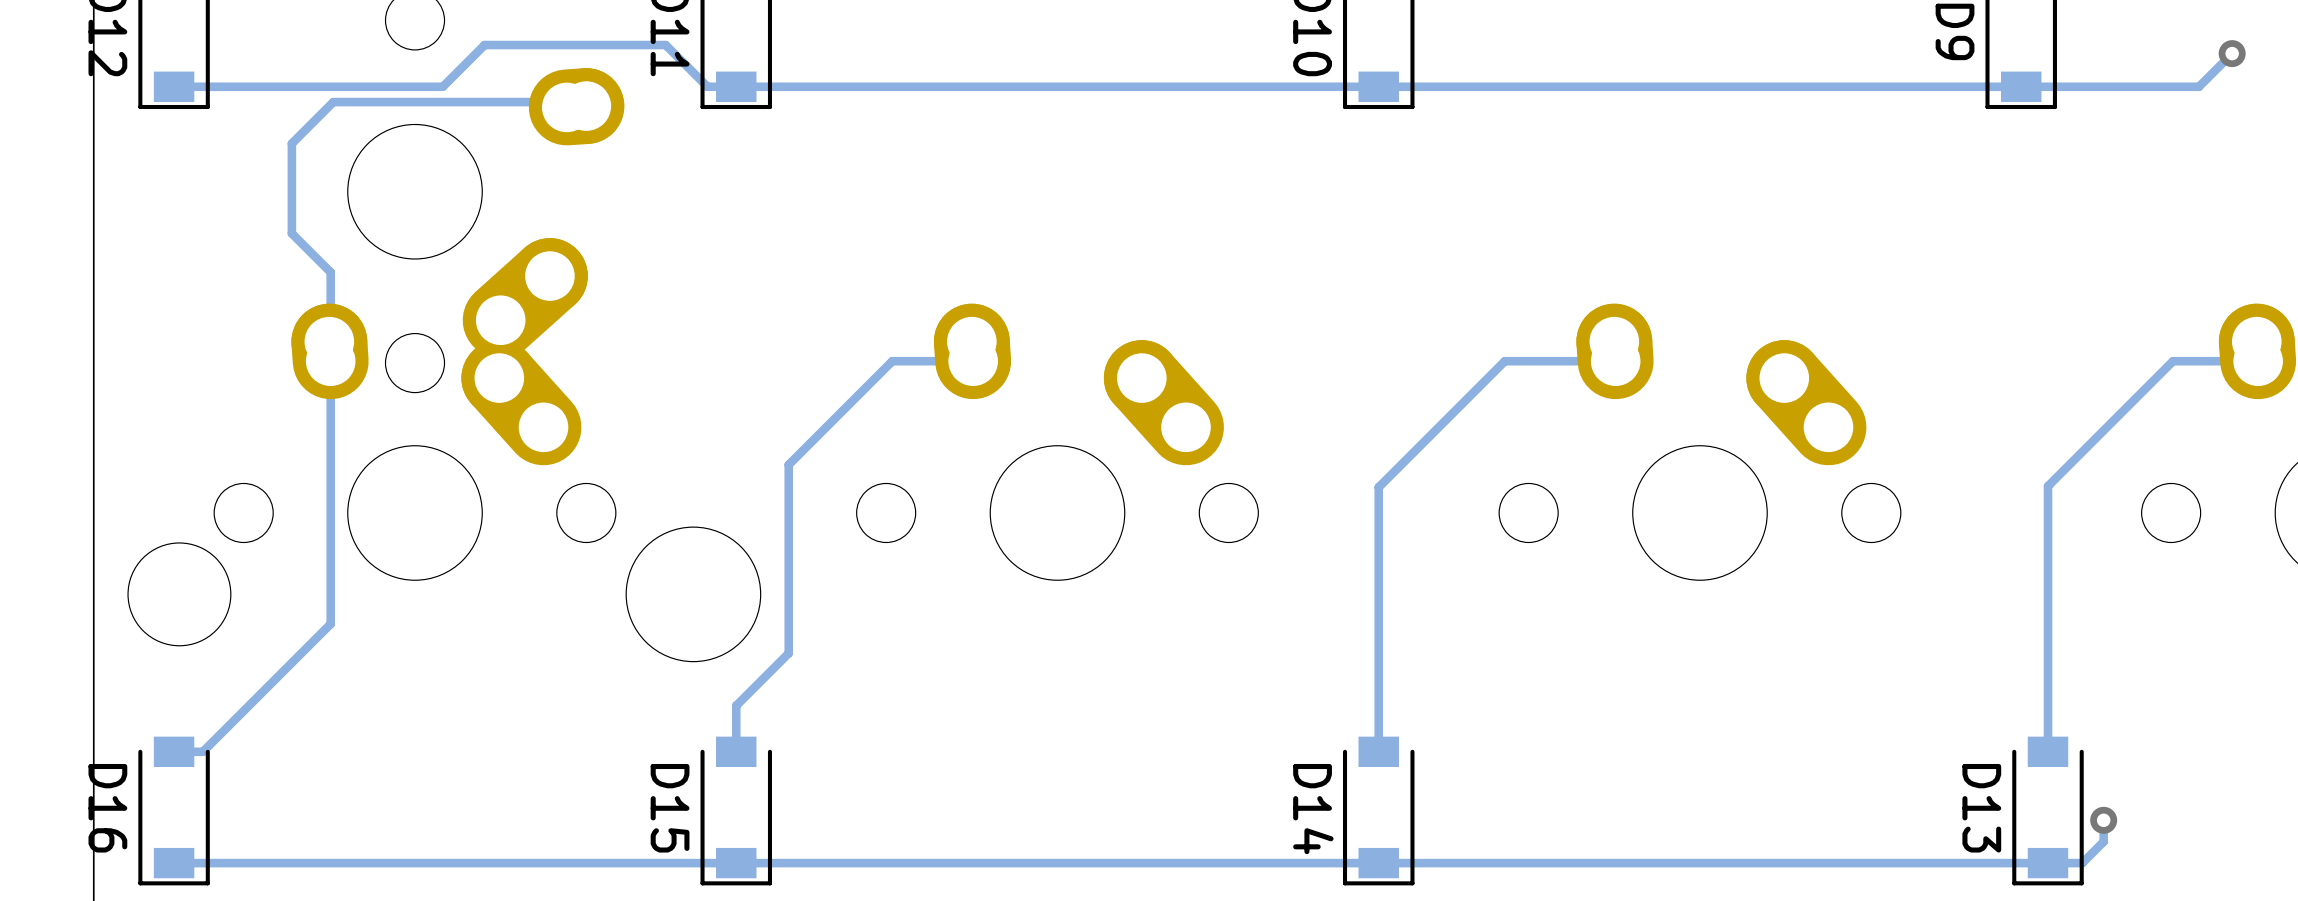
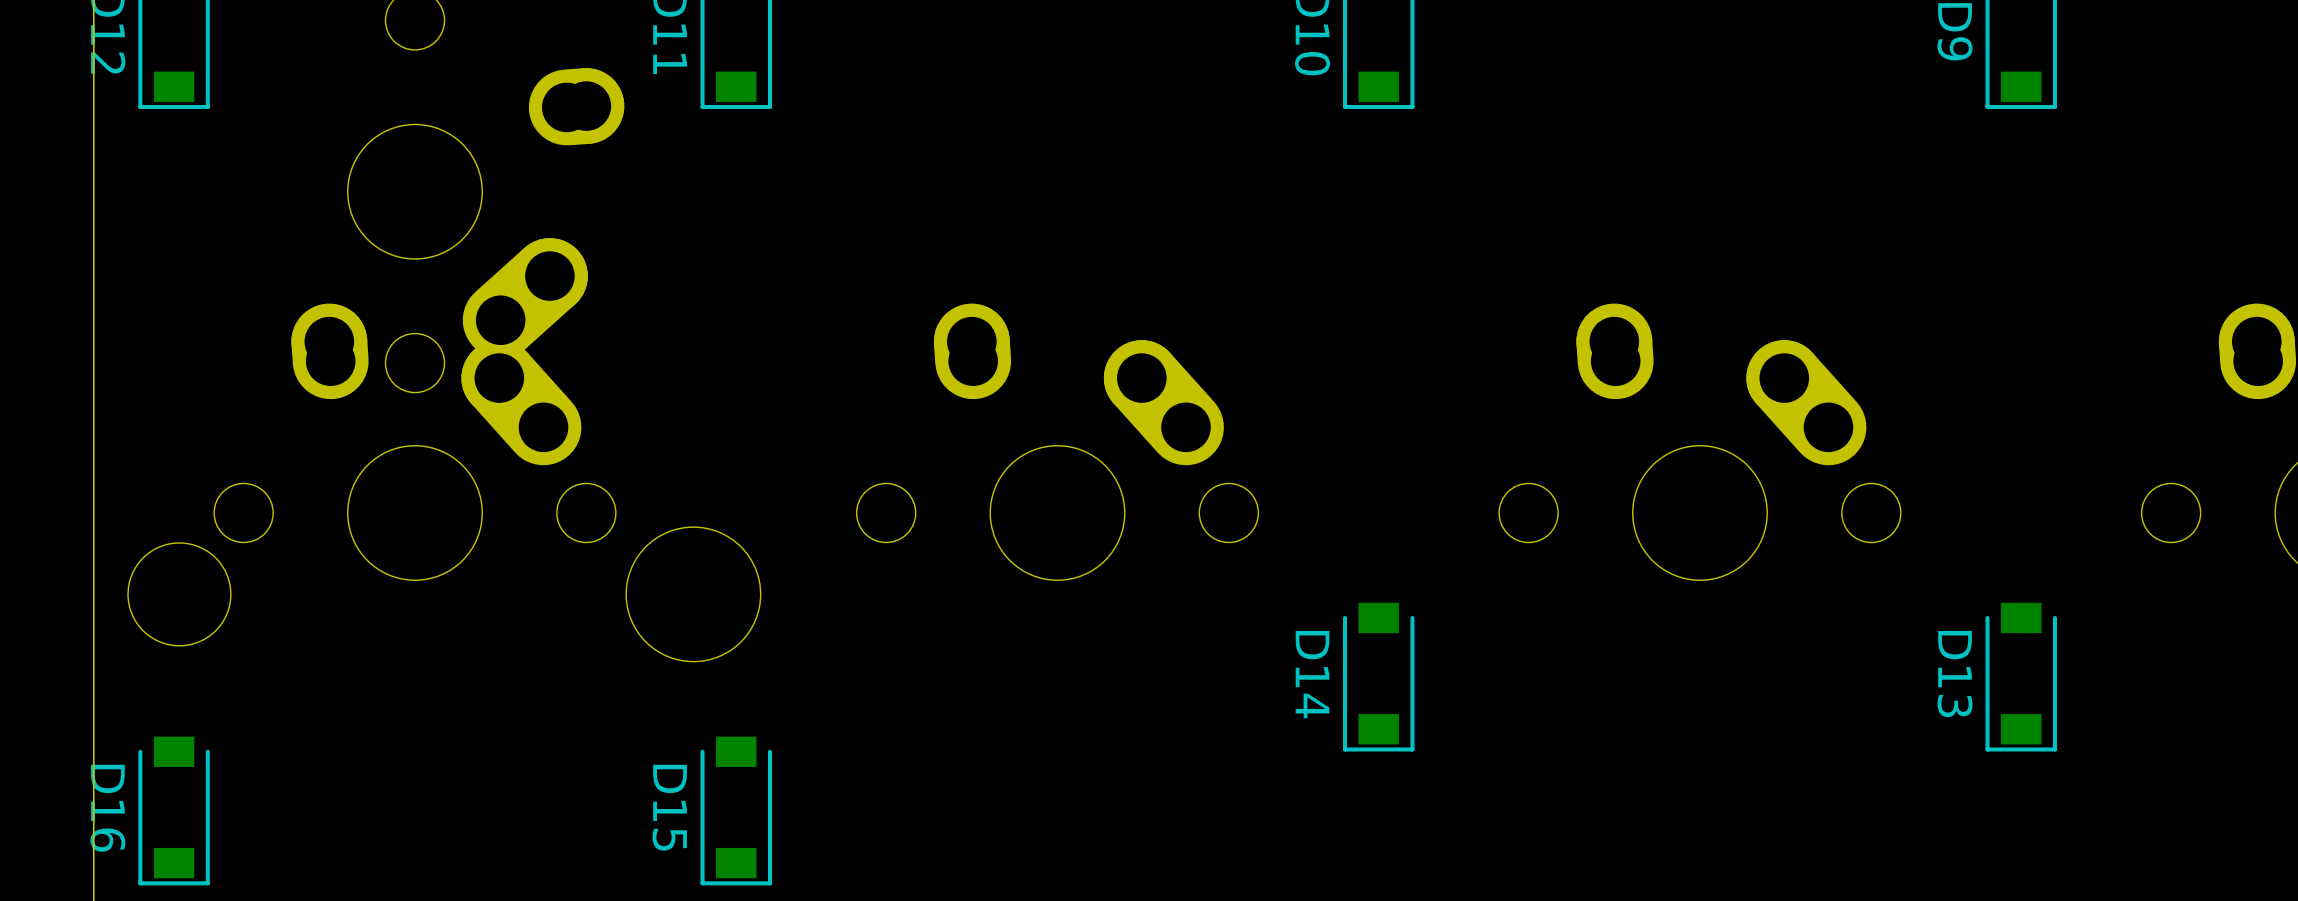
track: (2232, 53) (2199, 86) (707, 86) (665, 45) (484, 45) (442, 86) (174, 86) -> none
via: (2232, 53) -> none
track: (566, 107) (561, 102) (333, 102) (291, 143) (291, 233) (330, 272) (330, 623) (202, 751) (174, 751) -> none
track: (973, 361) (892, 361) (788, 464) (788, 653) (736, 705) (736, 751) -> none
track: (1615, 361) (1504, 361) (1378, 487) (1378, 751) -> none
track: (2258, 361) (2172, 361) (2047, 486) (2047, 751) -> none
D14 position: (1378, 811) -> (1378, 677)
D13 position: (2047, 811) -> (2021, 677)
track: (2103, 820) (2103, 841) (2082, 863) -> none
via: (2103, 820) -> none
track: (2082, 863) (174, 863) -> none

